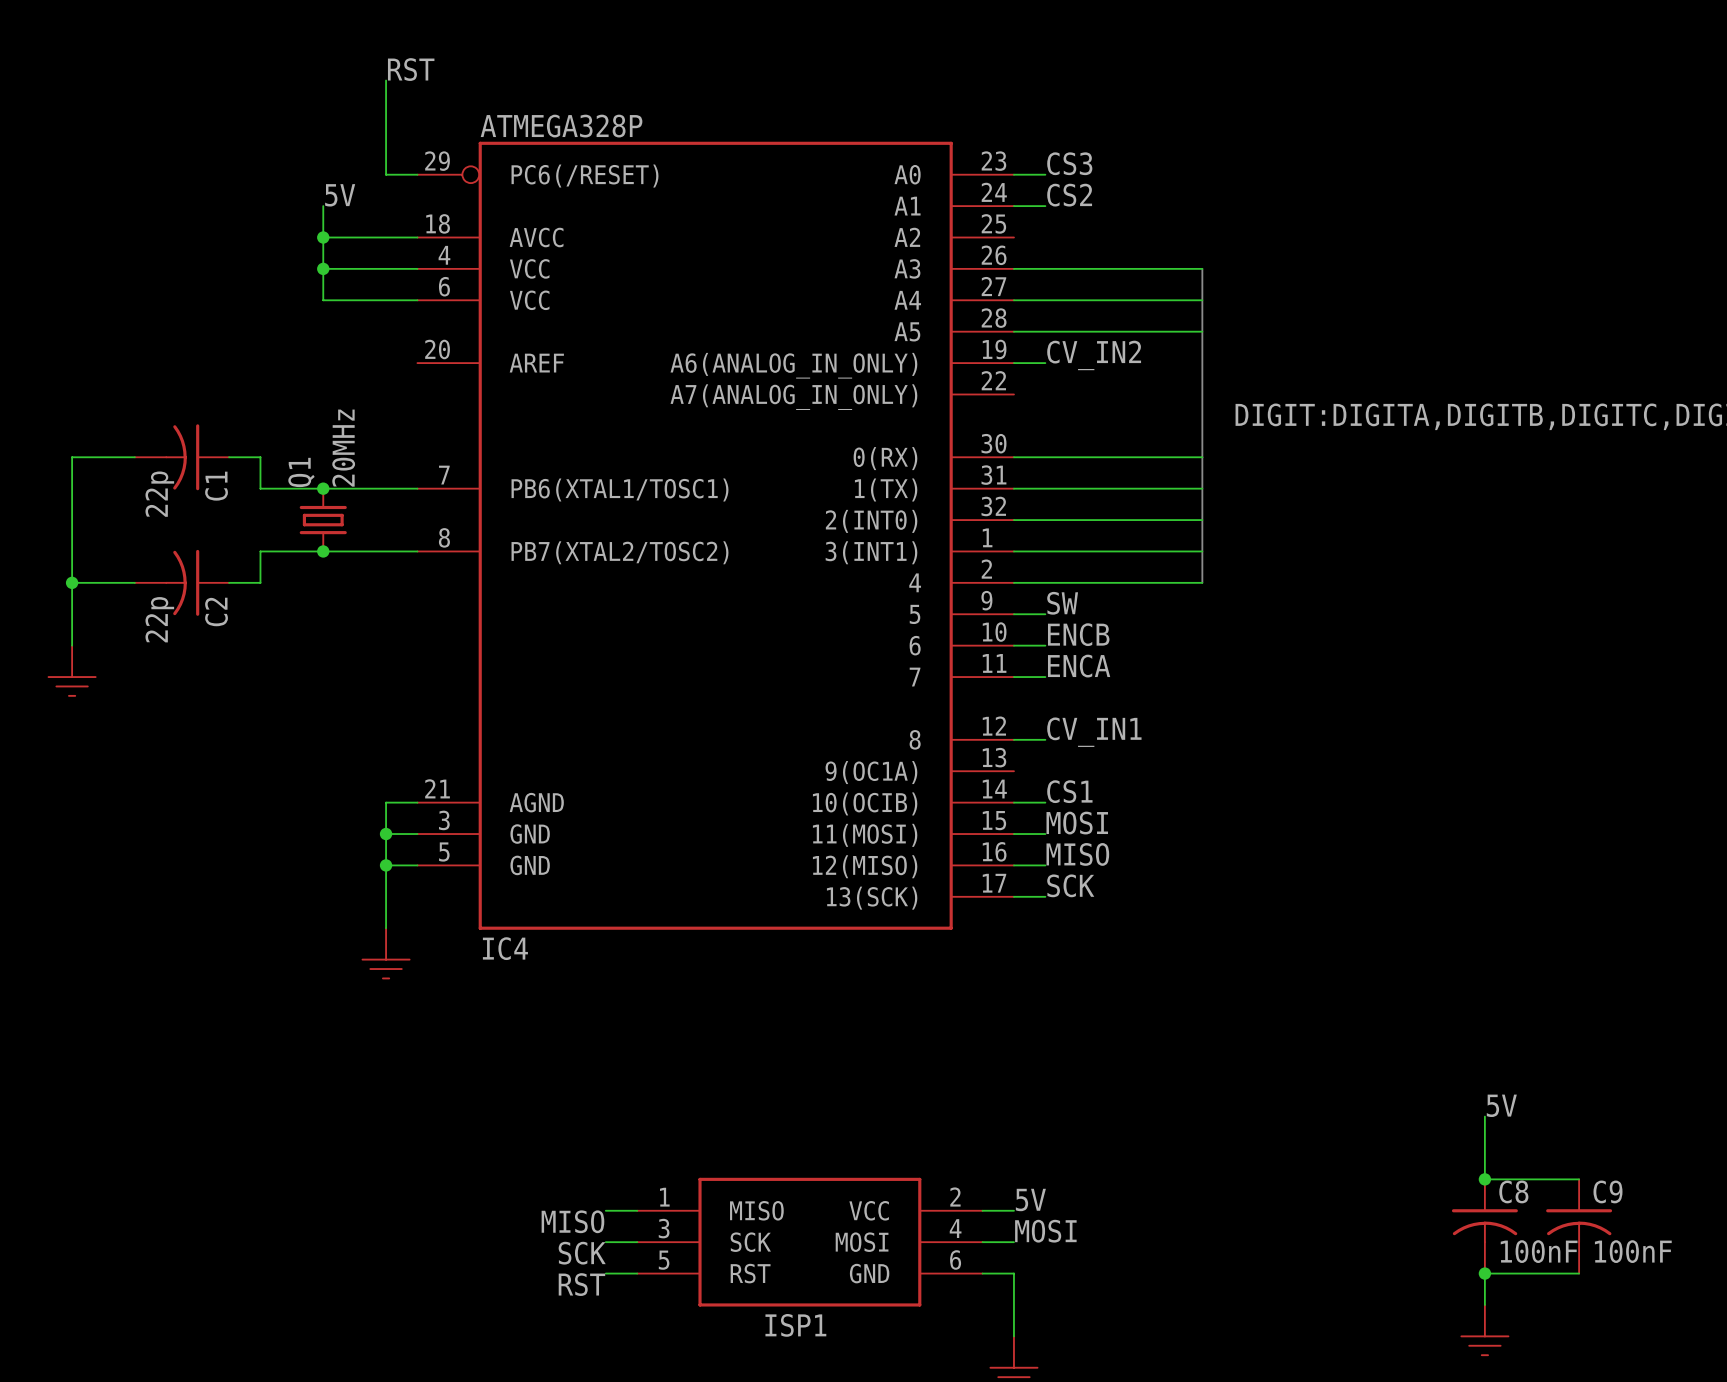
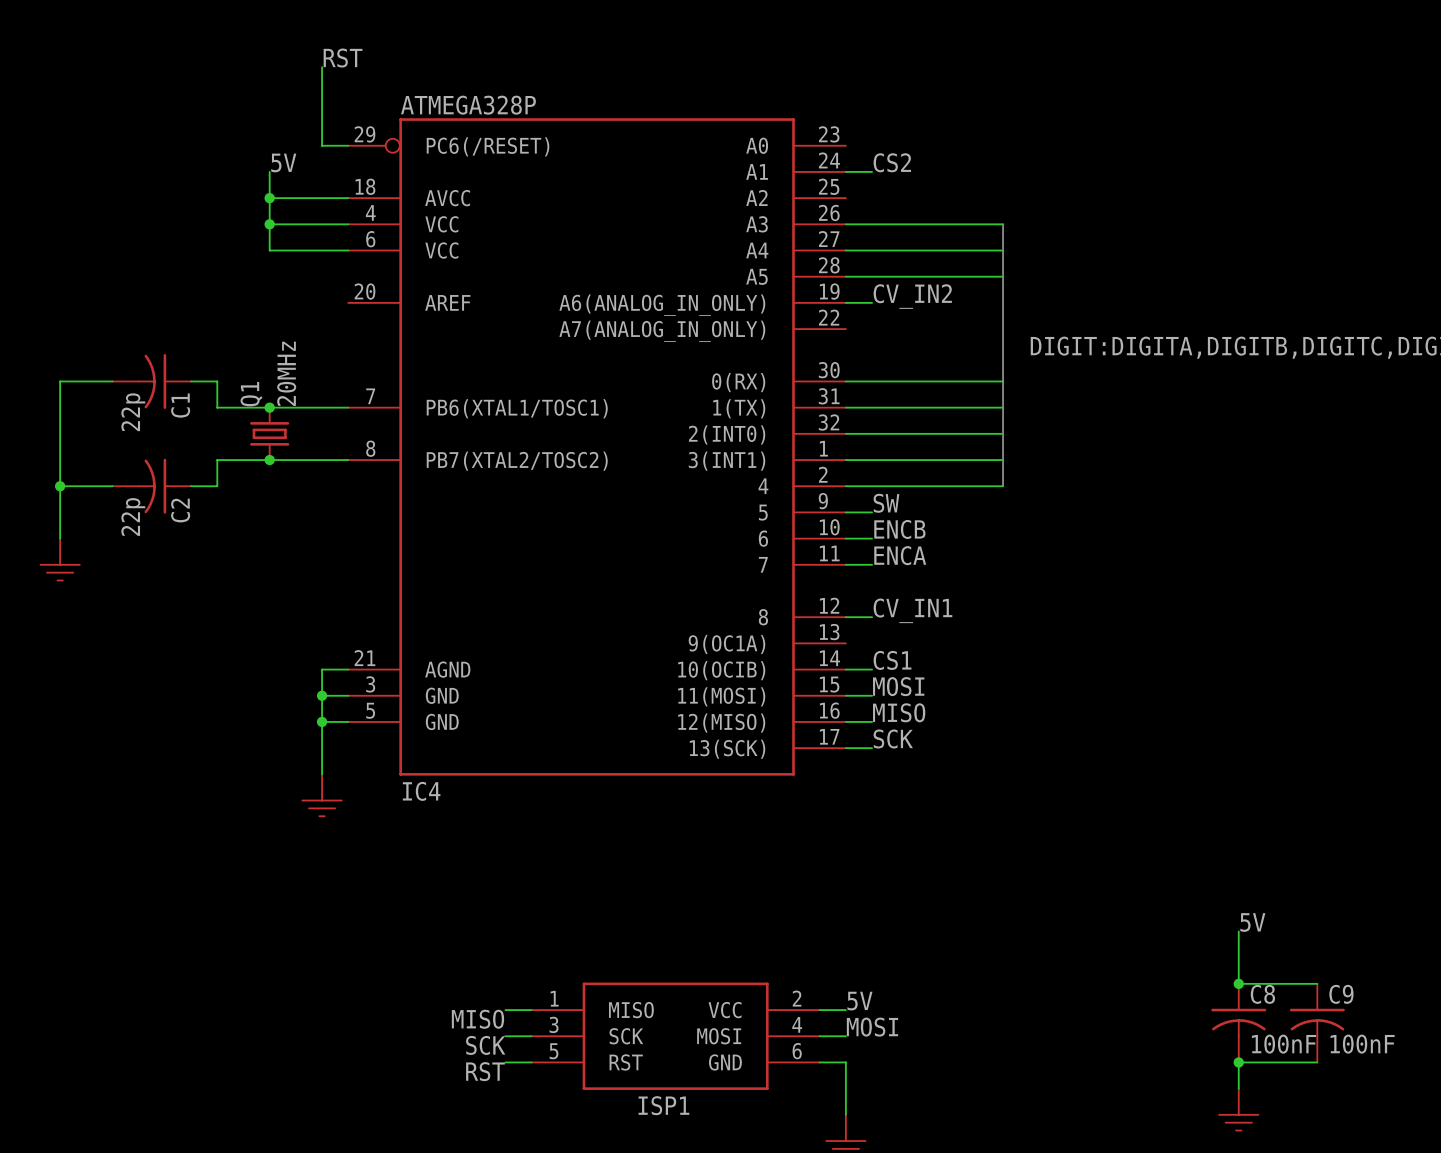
label: CS3 (1069, 163) -> none
wire: (1013, 174) (1045, 174) -> none

